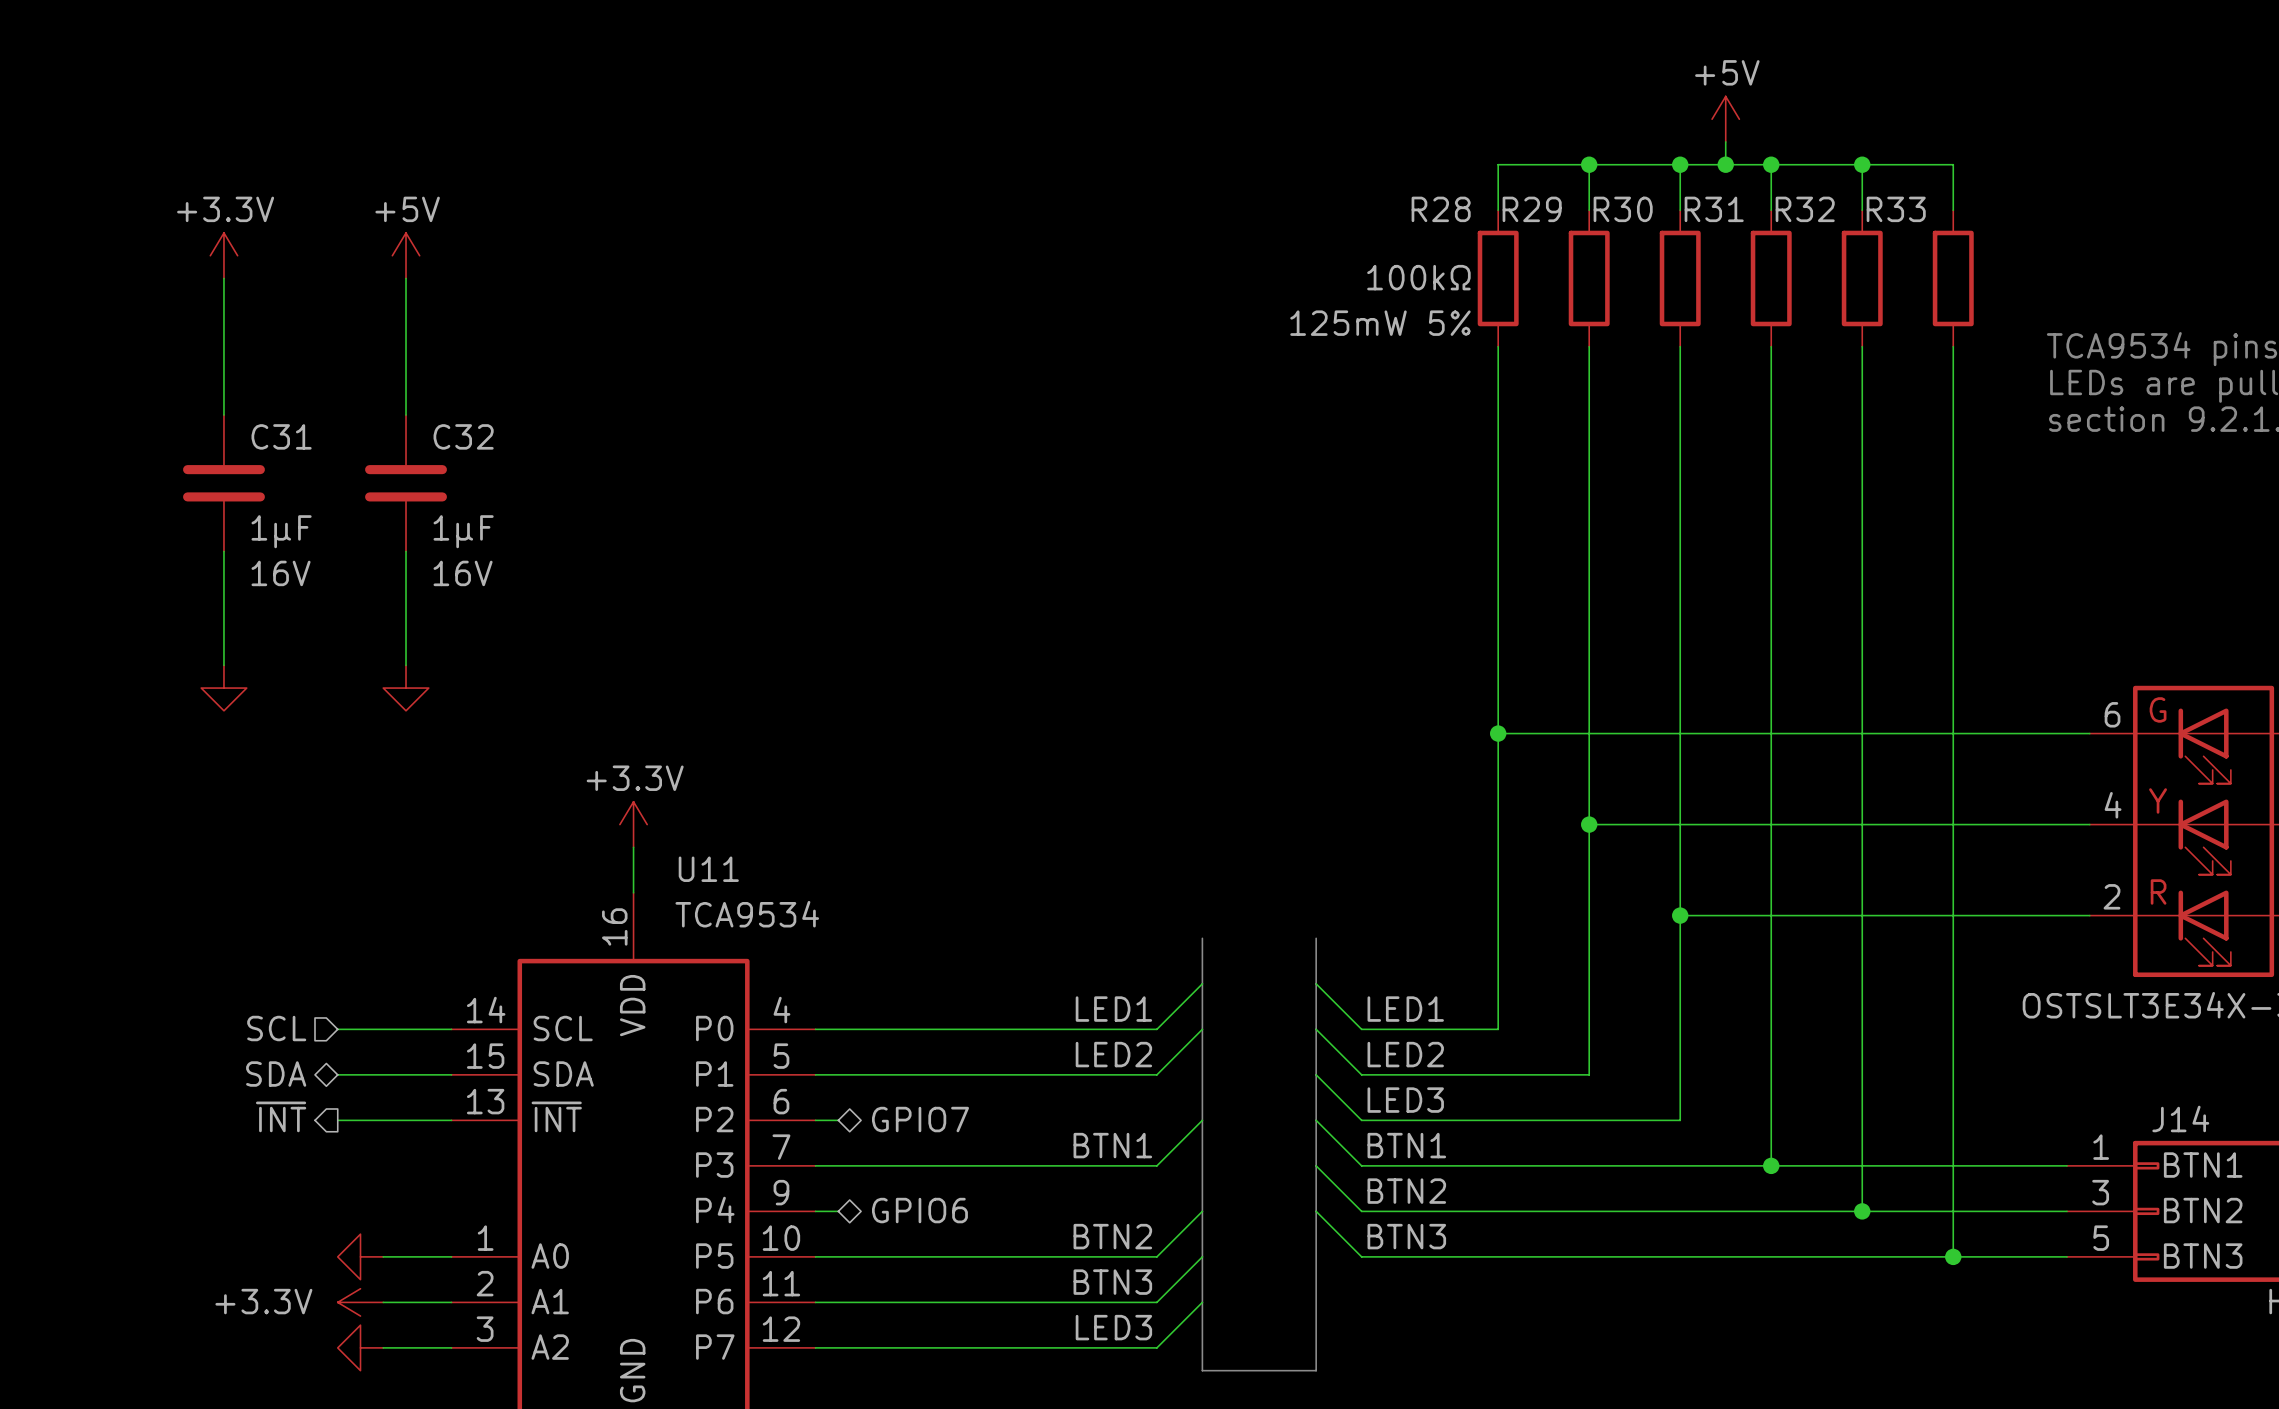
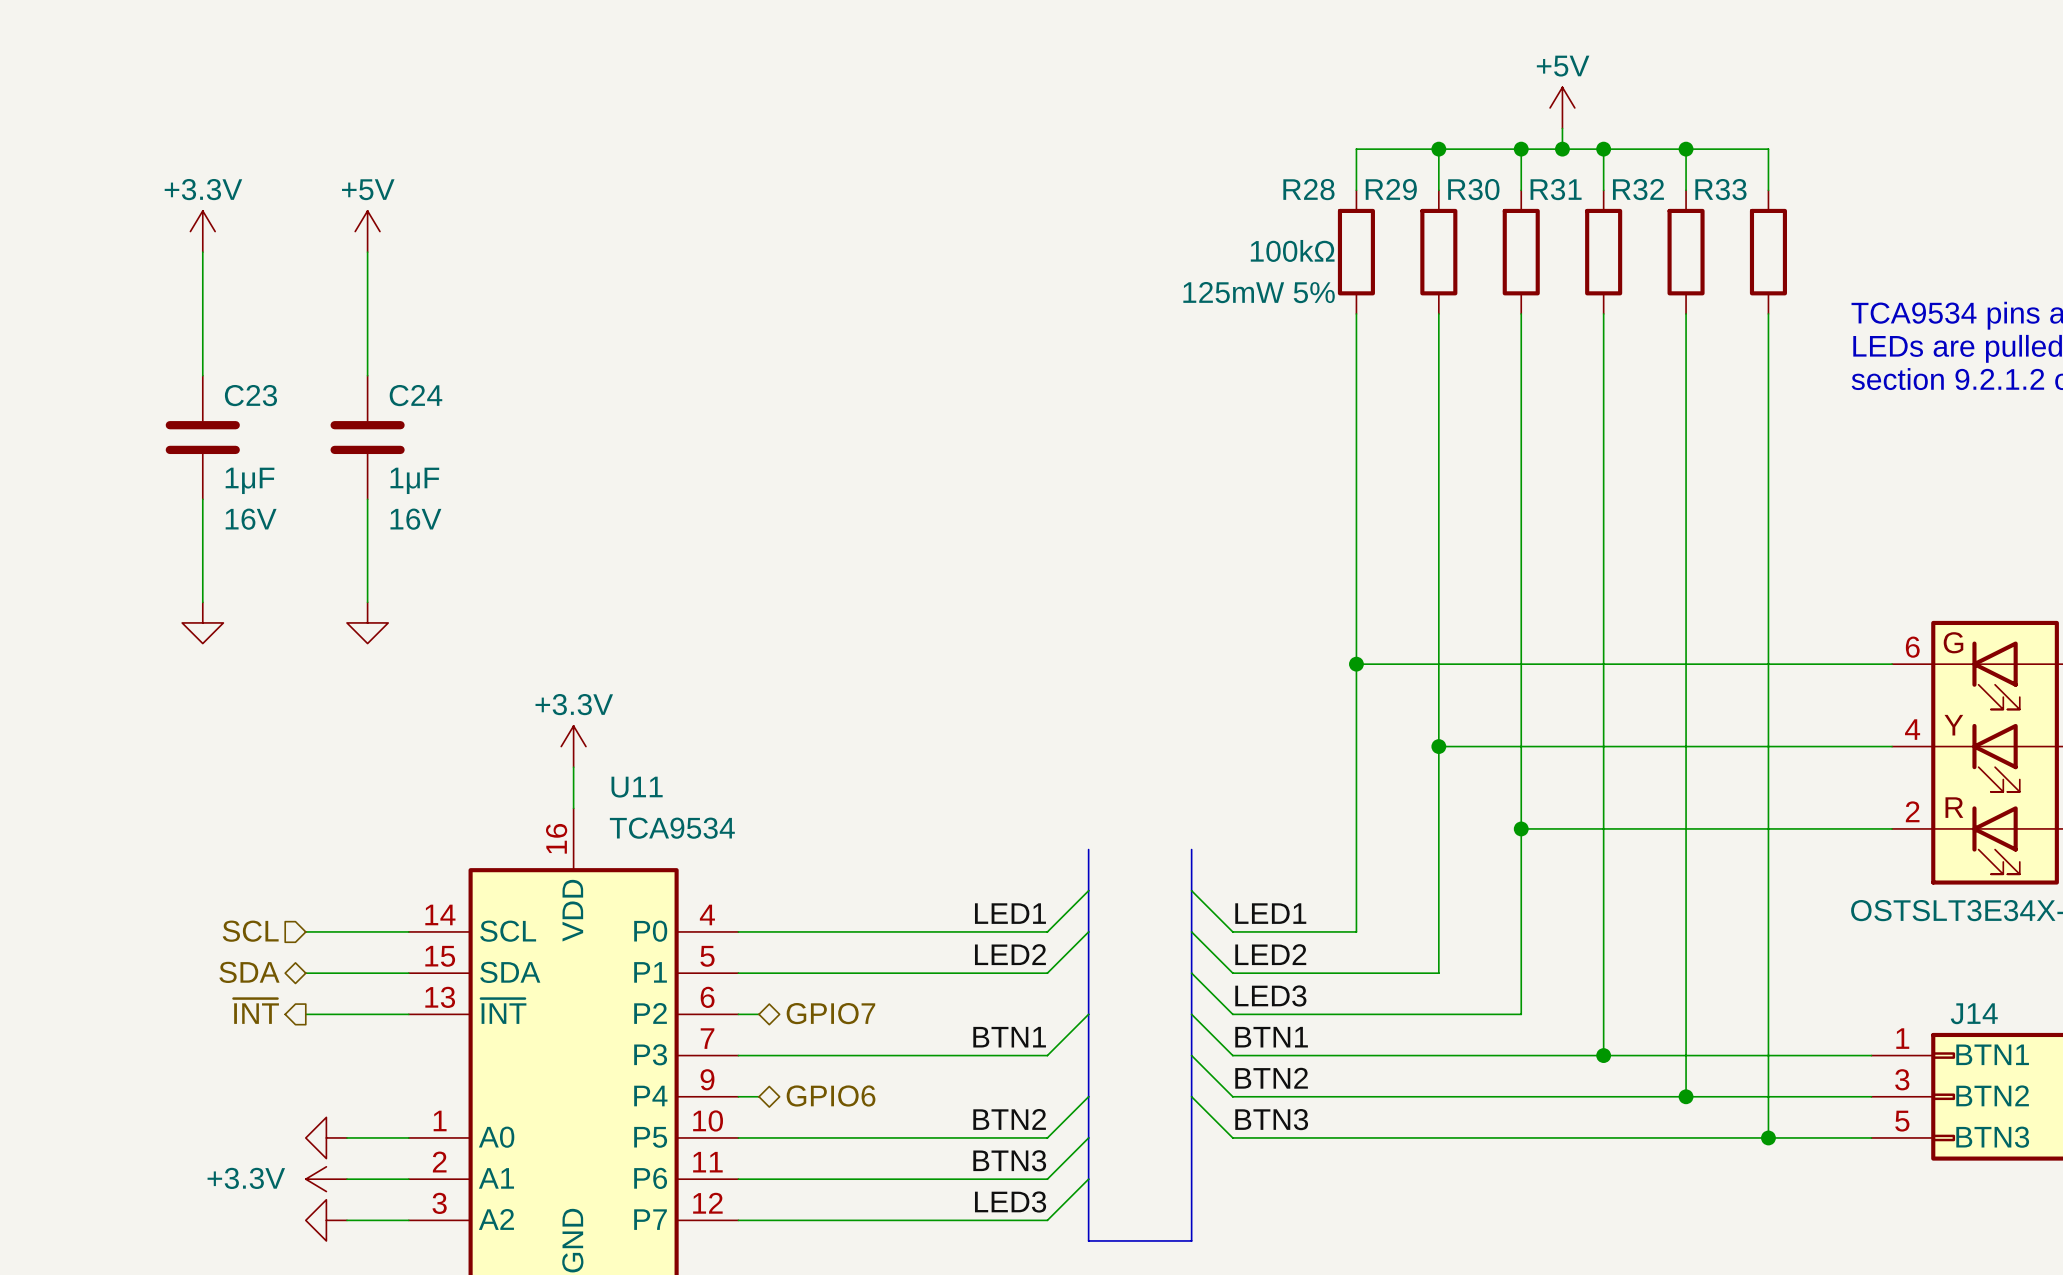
C31 name: C31 (281, 436) -> C23 (250, 395)
C32 name: C32 (463, 436) -> C24 (415, 395)

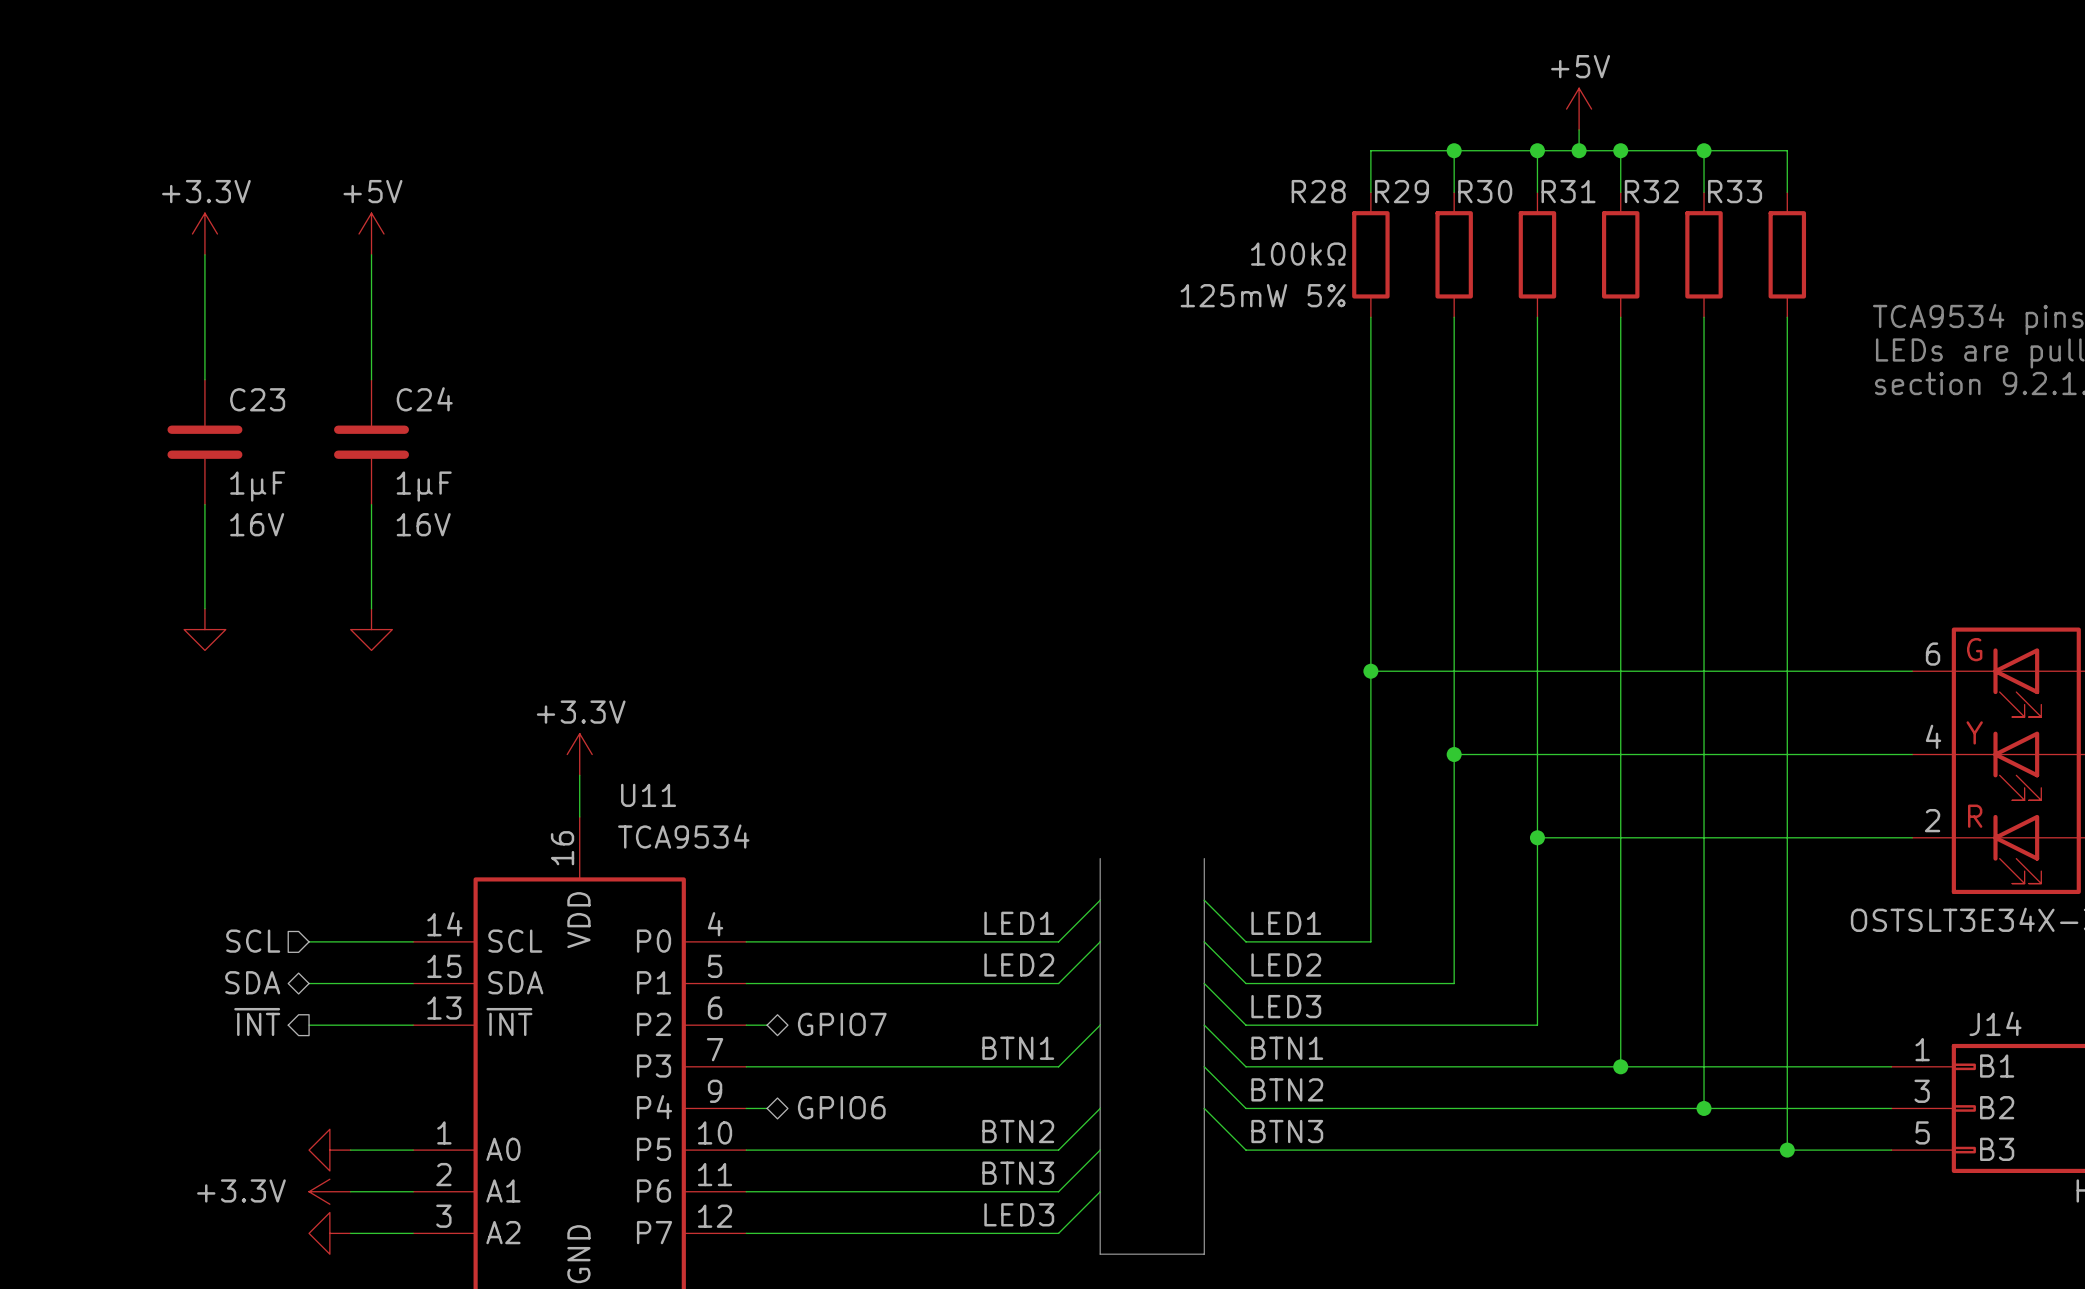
J14 text: BTN1 (1992, 1054) -> B1 (1997, 1066)
J14 text: BTN2 (1992, 1095) -> B2 (1997, 1107)
J14 text: BTN3 (1992, 1137) -> B3 (1997, 1149)

